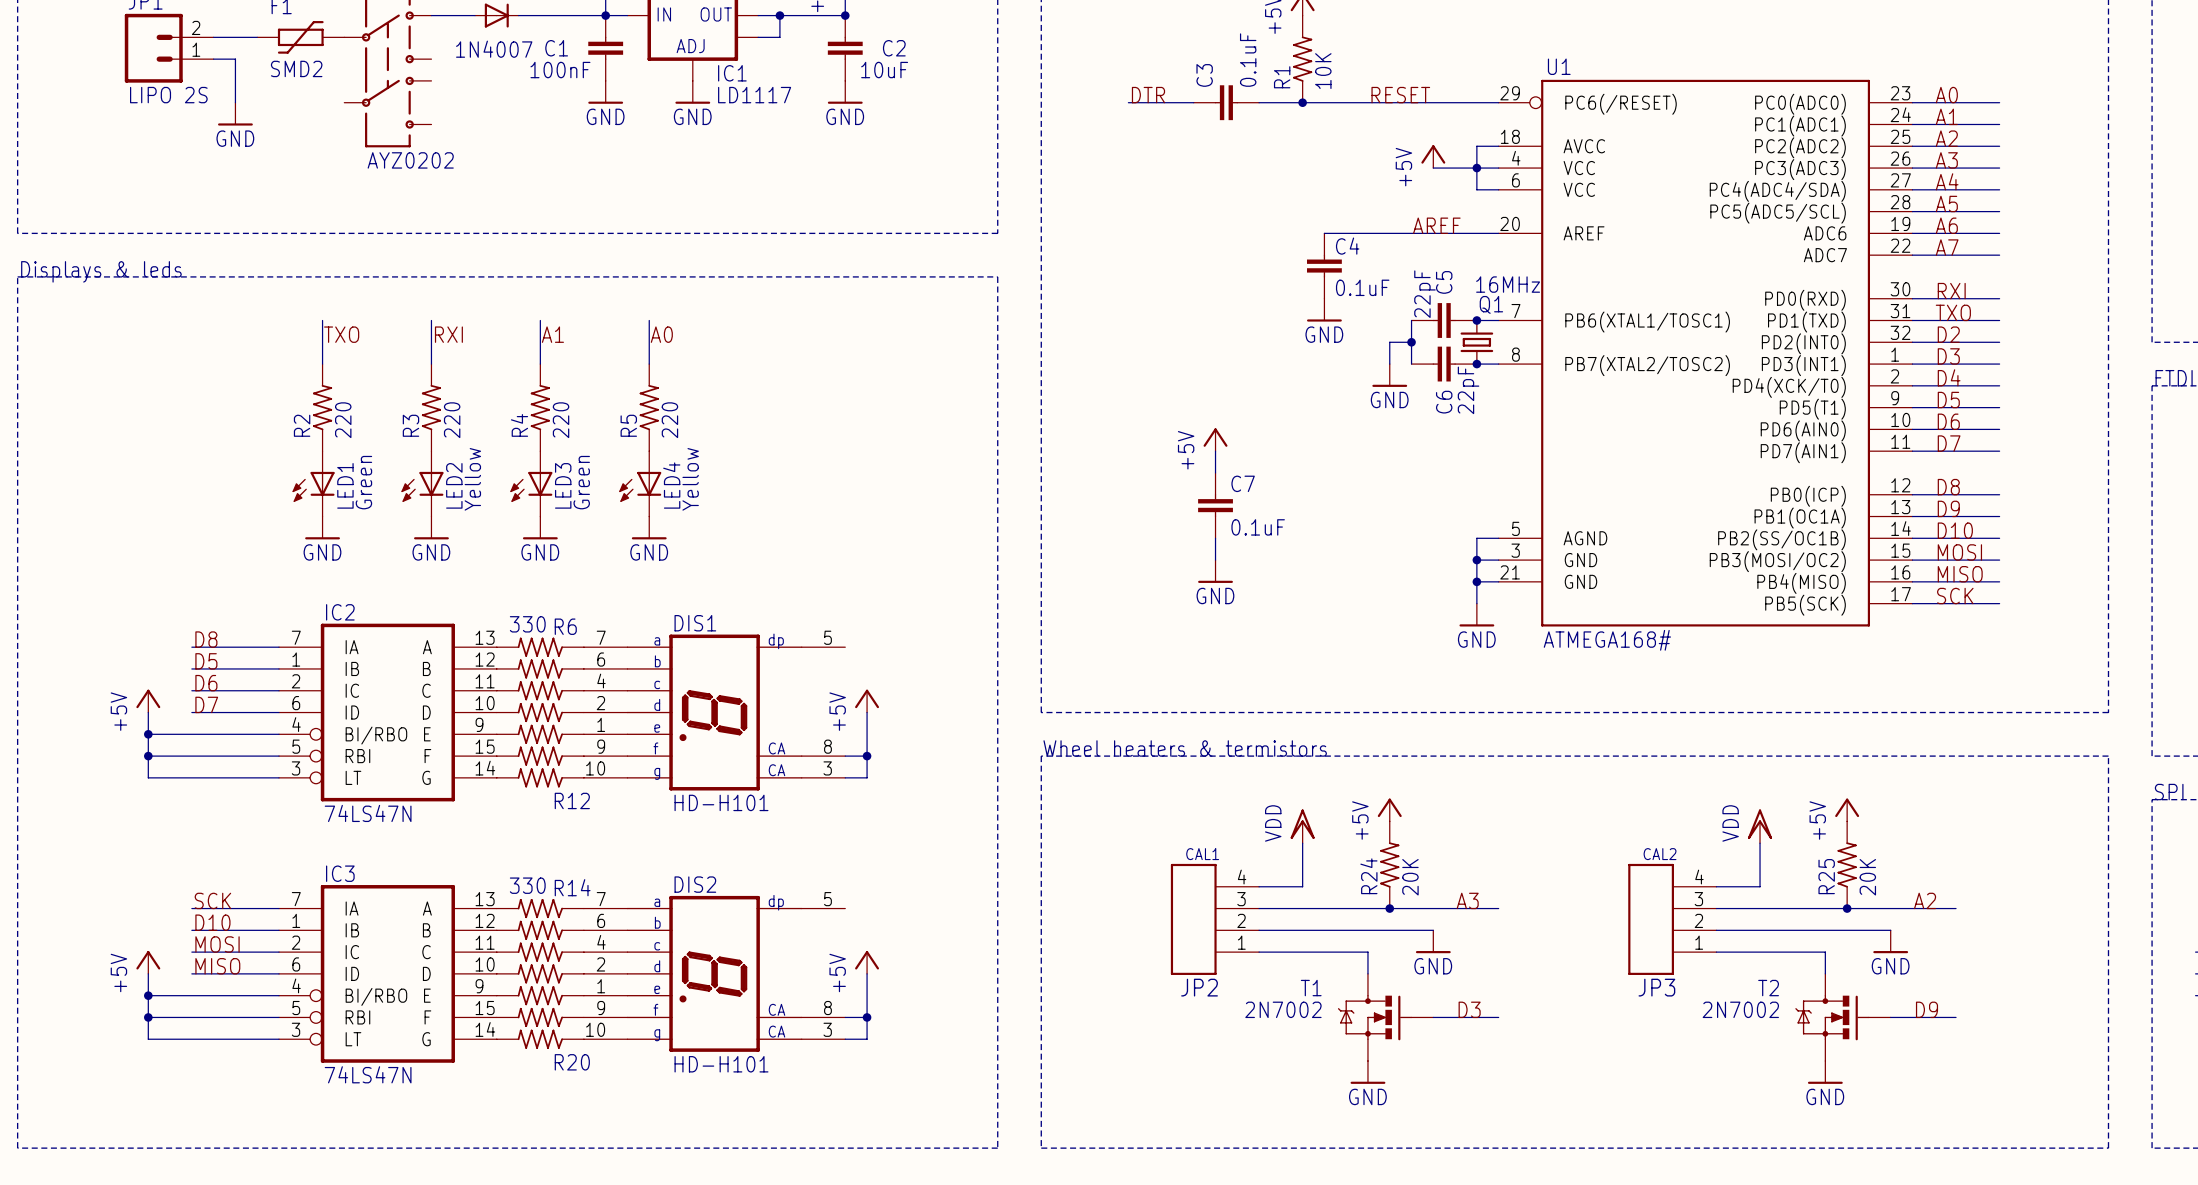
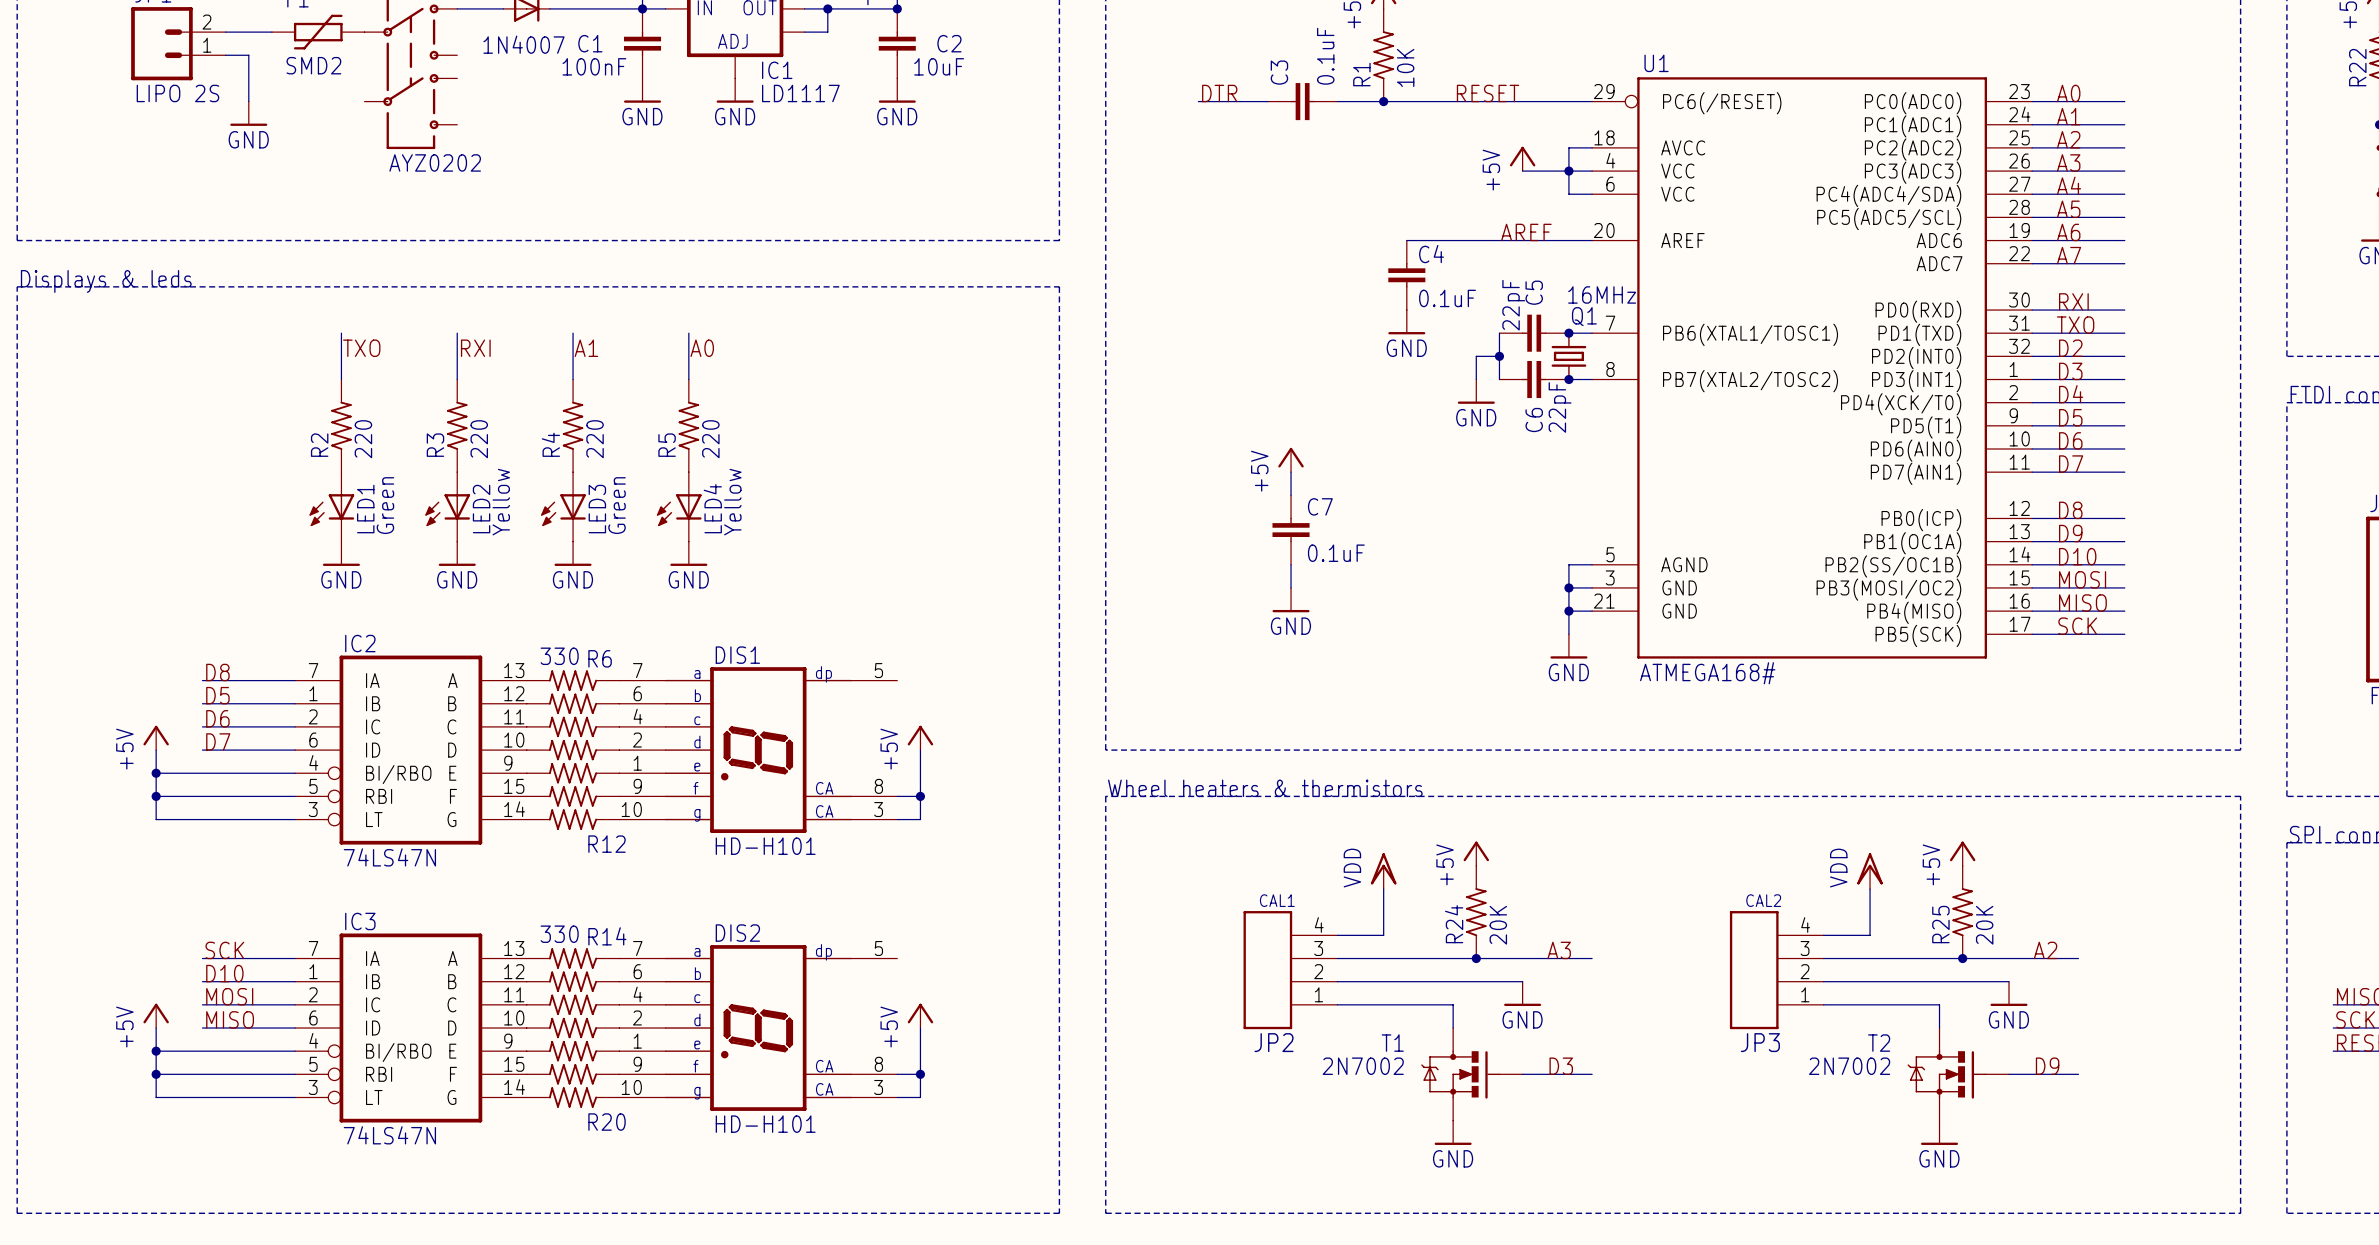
text: Wheel heaters & termistors (1185, 748) -> Wheel heaters & thermistors (1265, 788)

